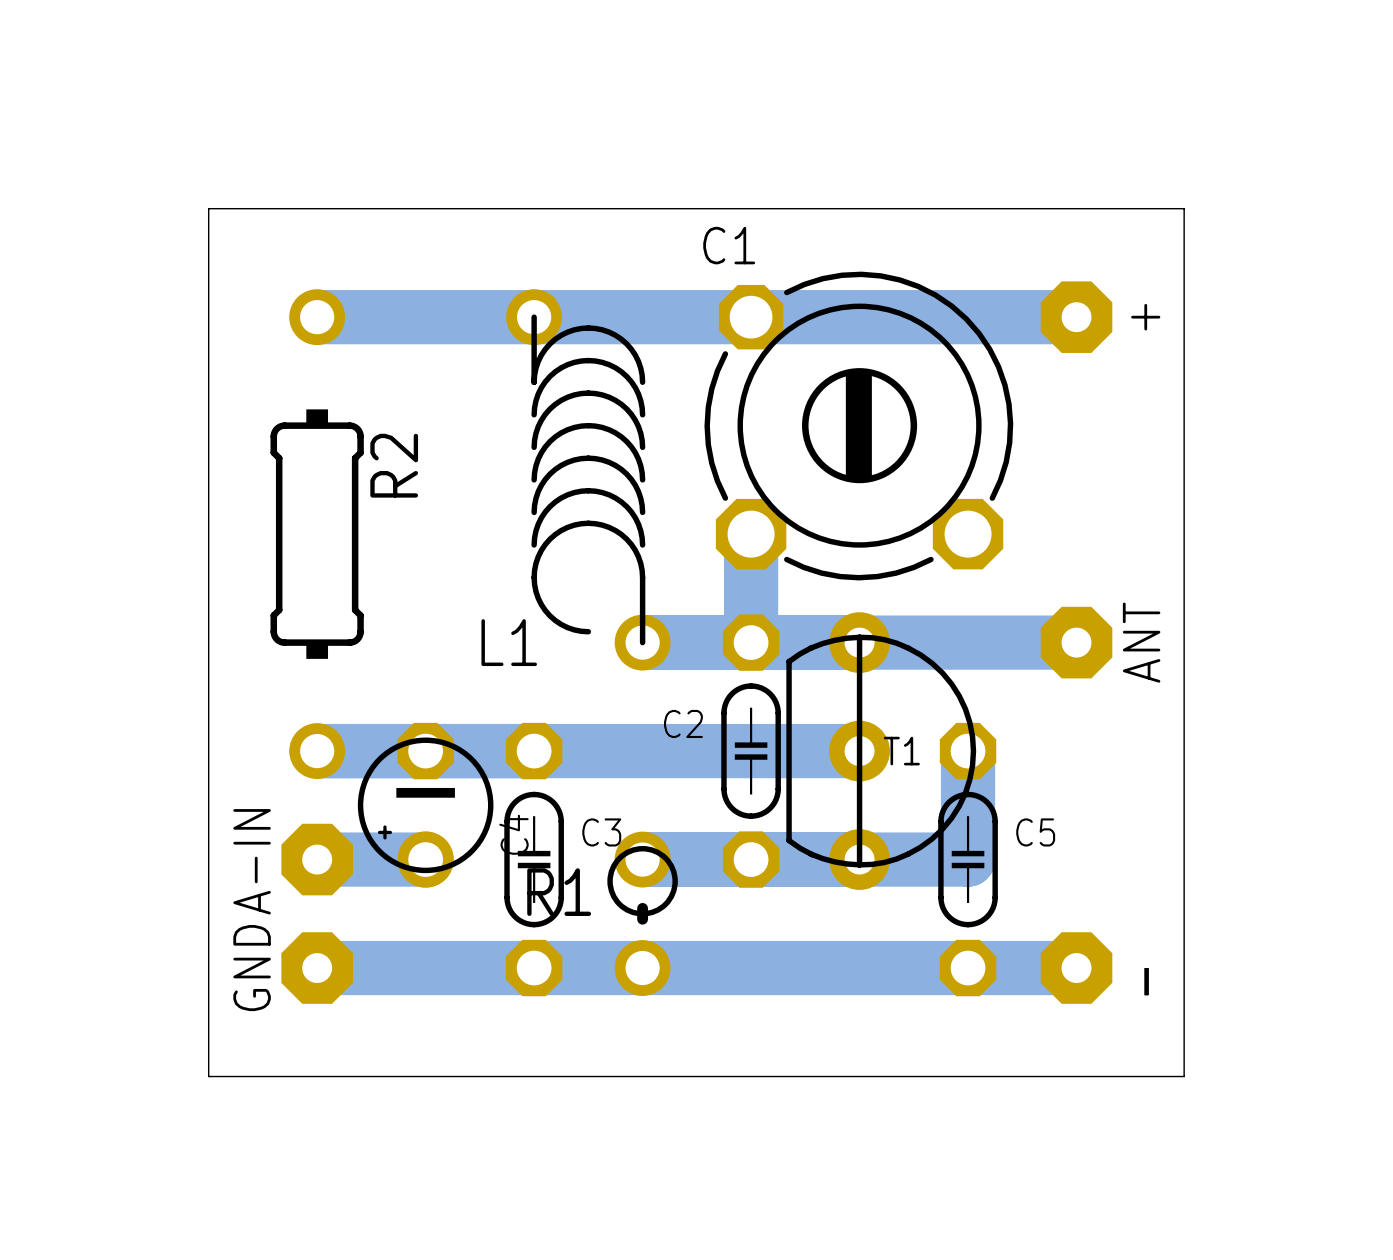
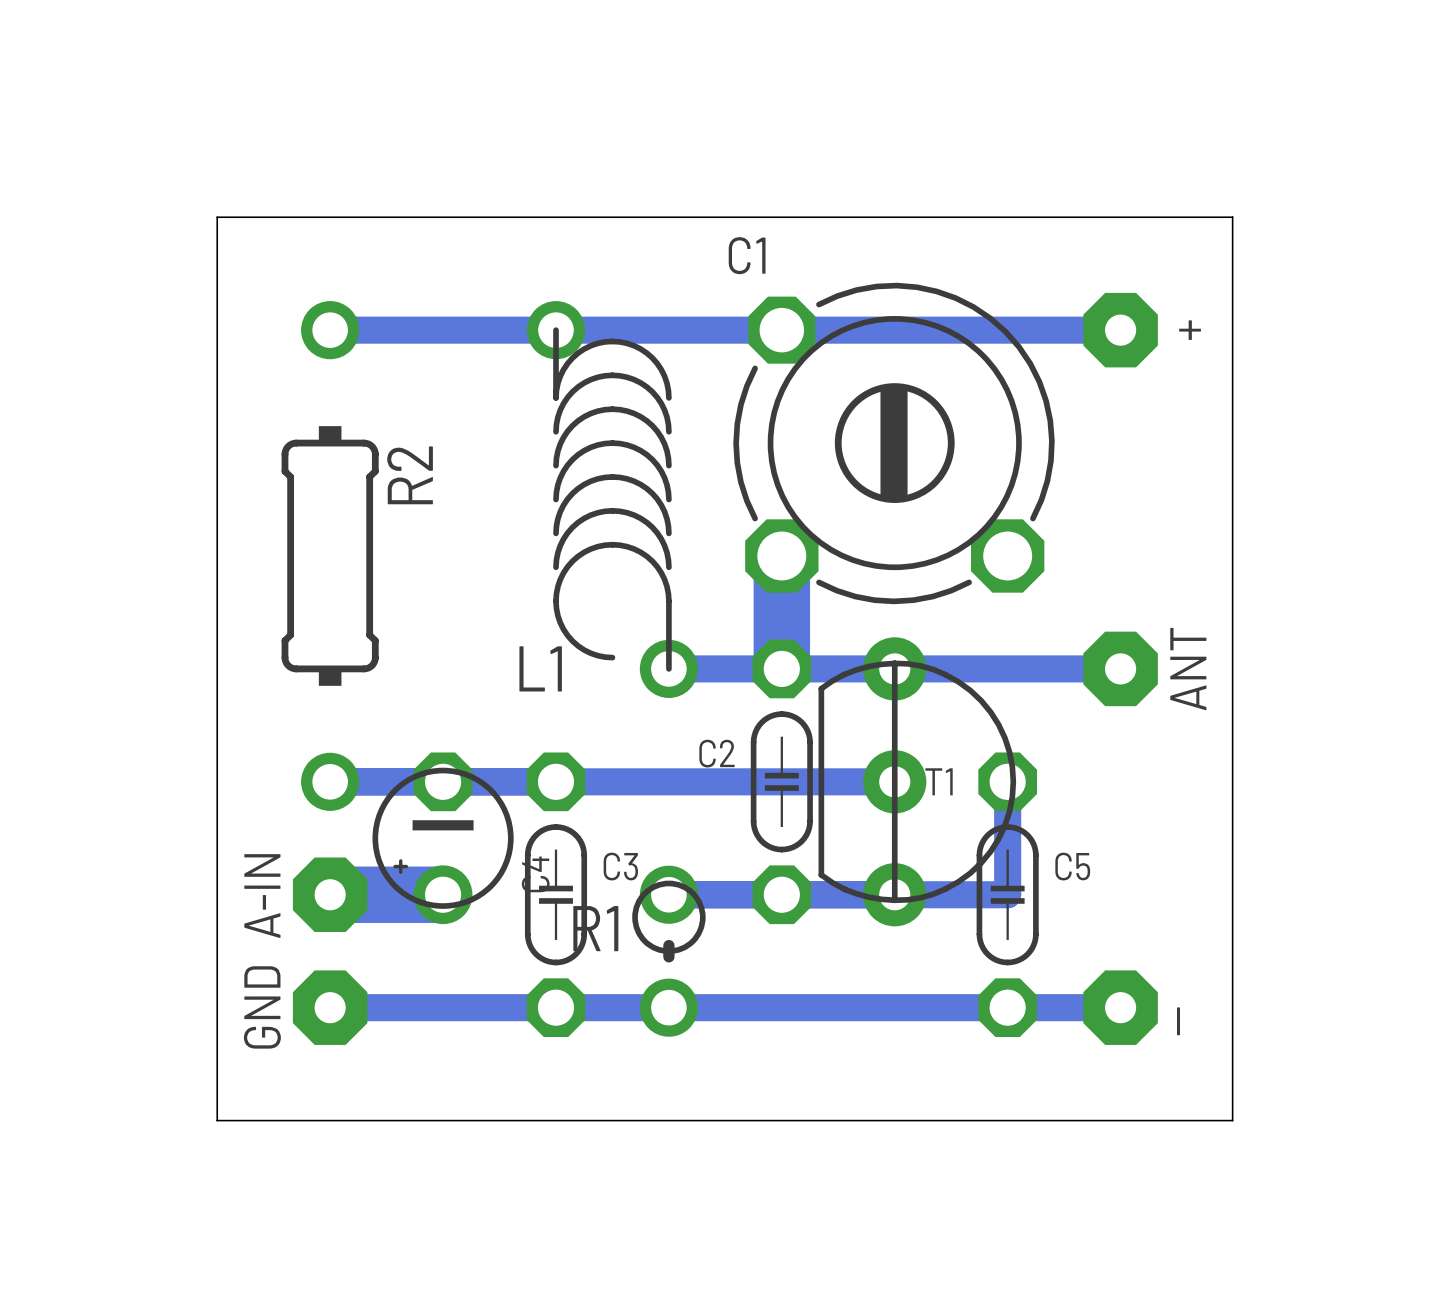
bottom track width: thick (317, 317) (1076, 317) -> thin (330, 330) (1120, 330)
bottom track width: thick (642, 642) (1076, 642) -> thin (668, 668) (1120, 668)
bottom track width: thick (317, 751) (859, 751) -> thin (330, 781) (894, 781)
bottom track width: thick (968, 751) (968, 859) (642, 859) -> thin (1007, 781) (1007, 894) (668, 894)
bottom track width: thick (317, 968) (1076, 968) -> thin (330, 1007) (1120, 1007)

